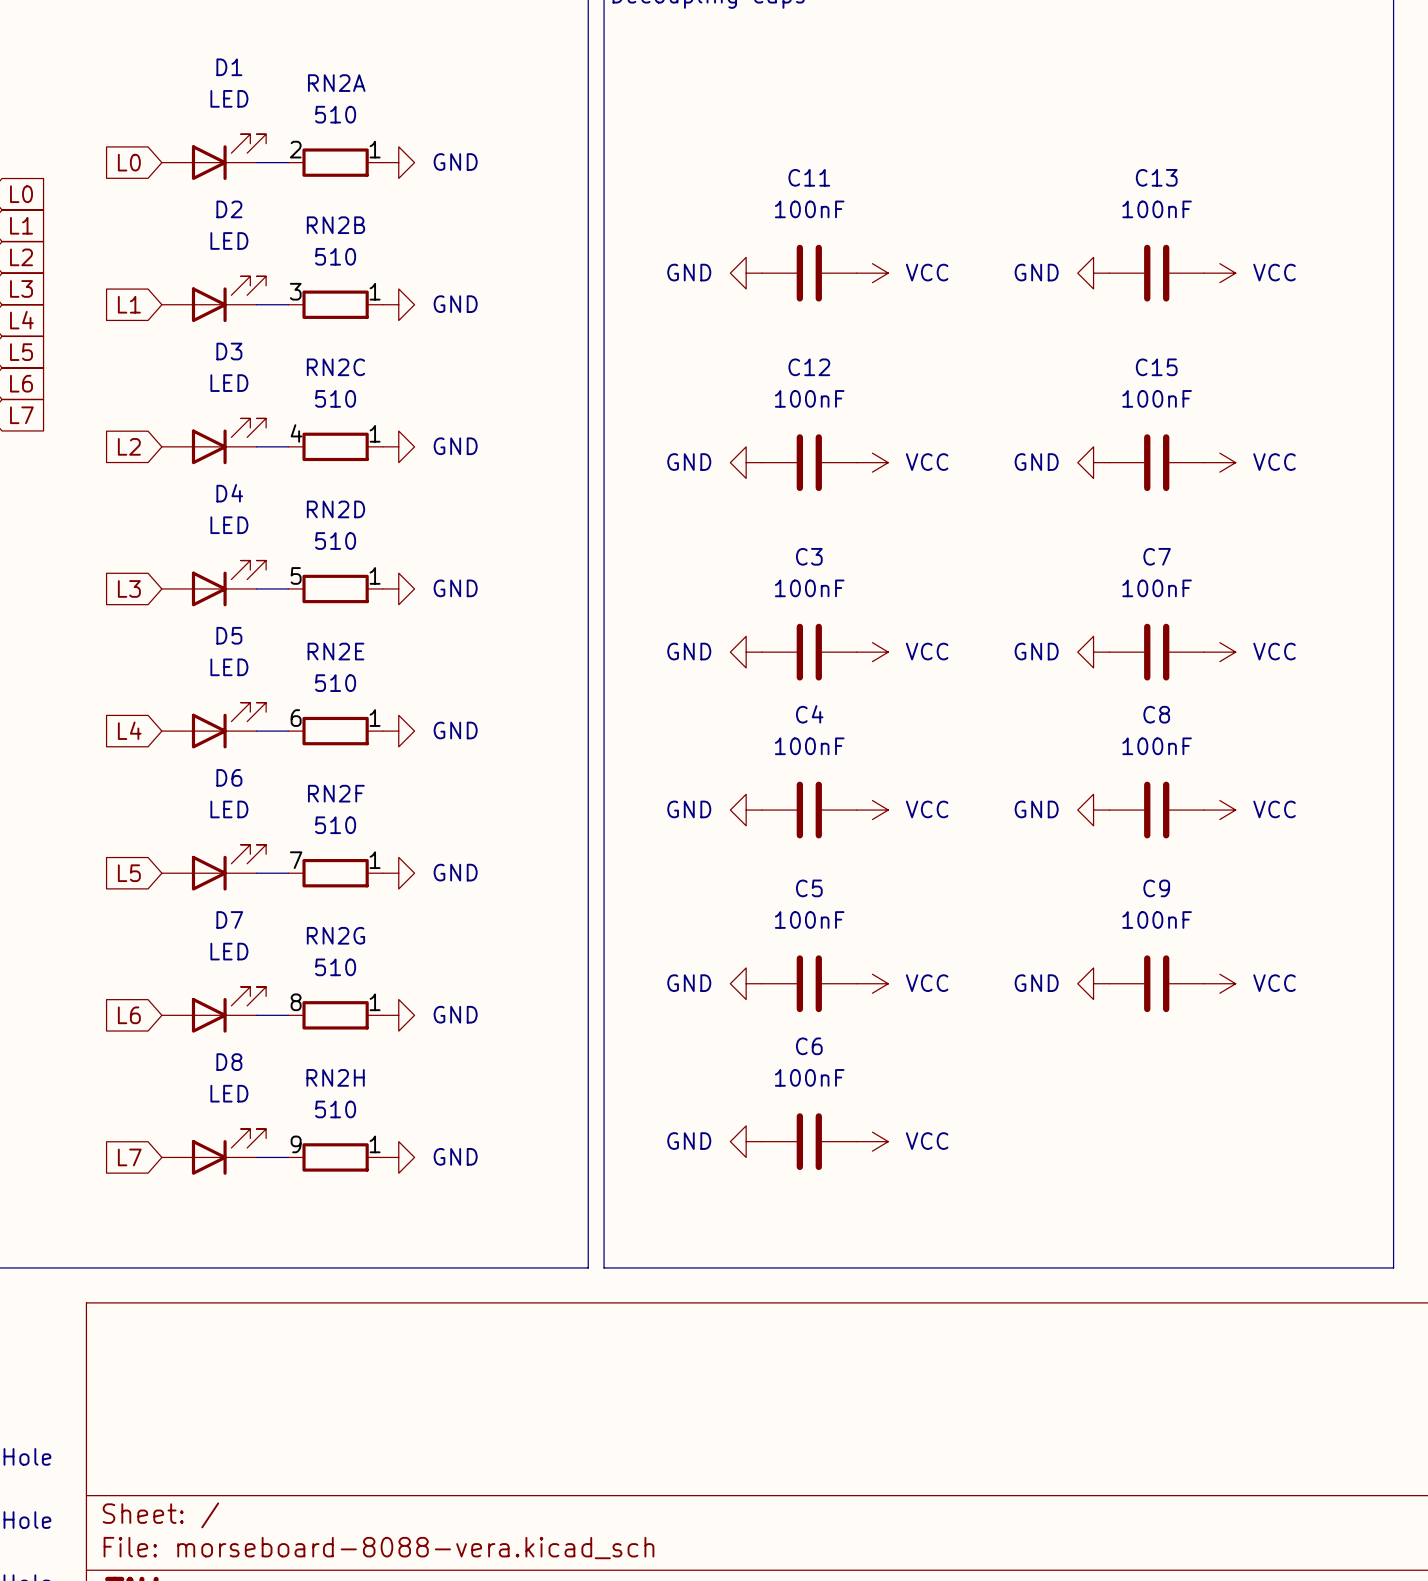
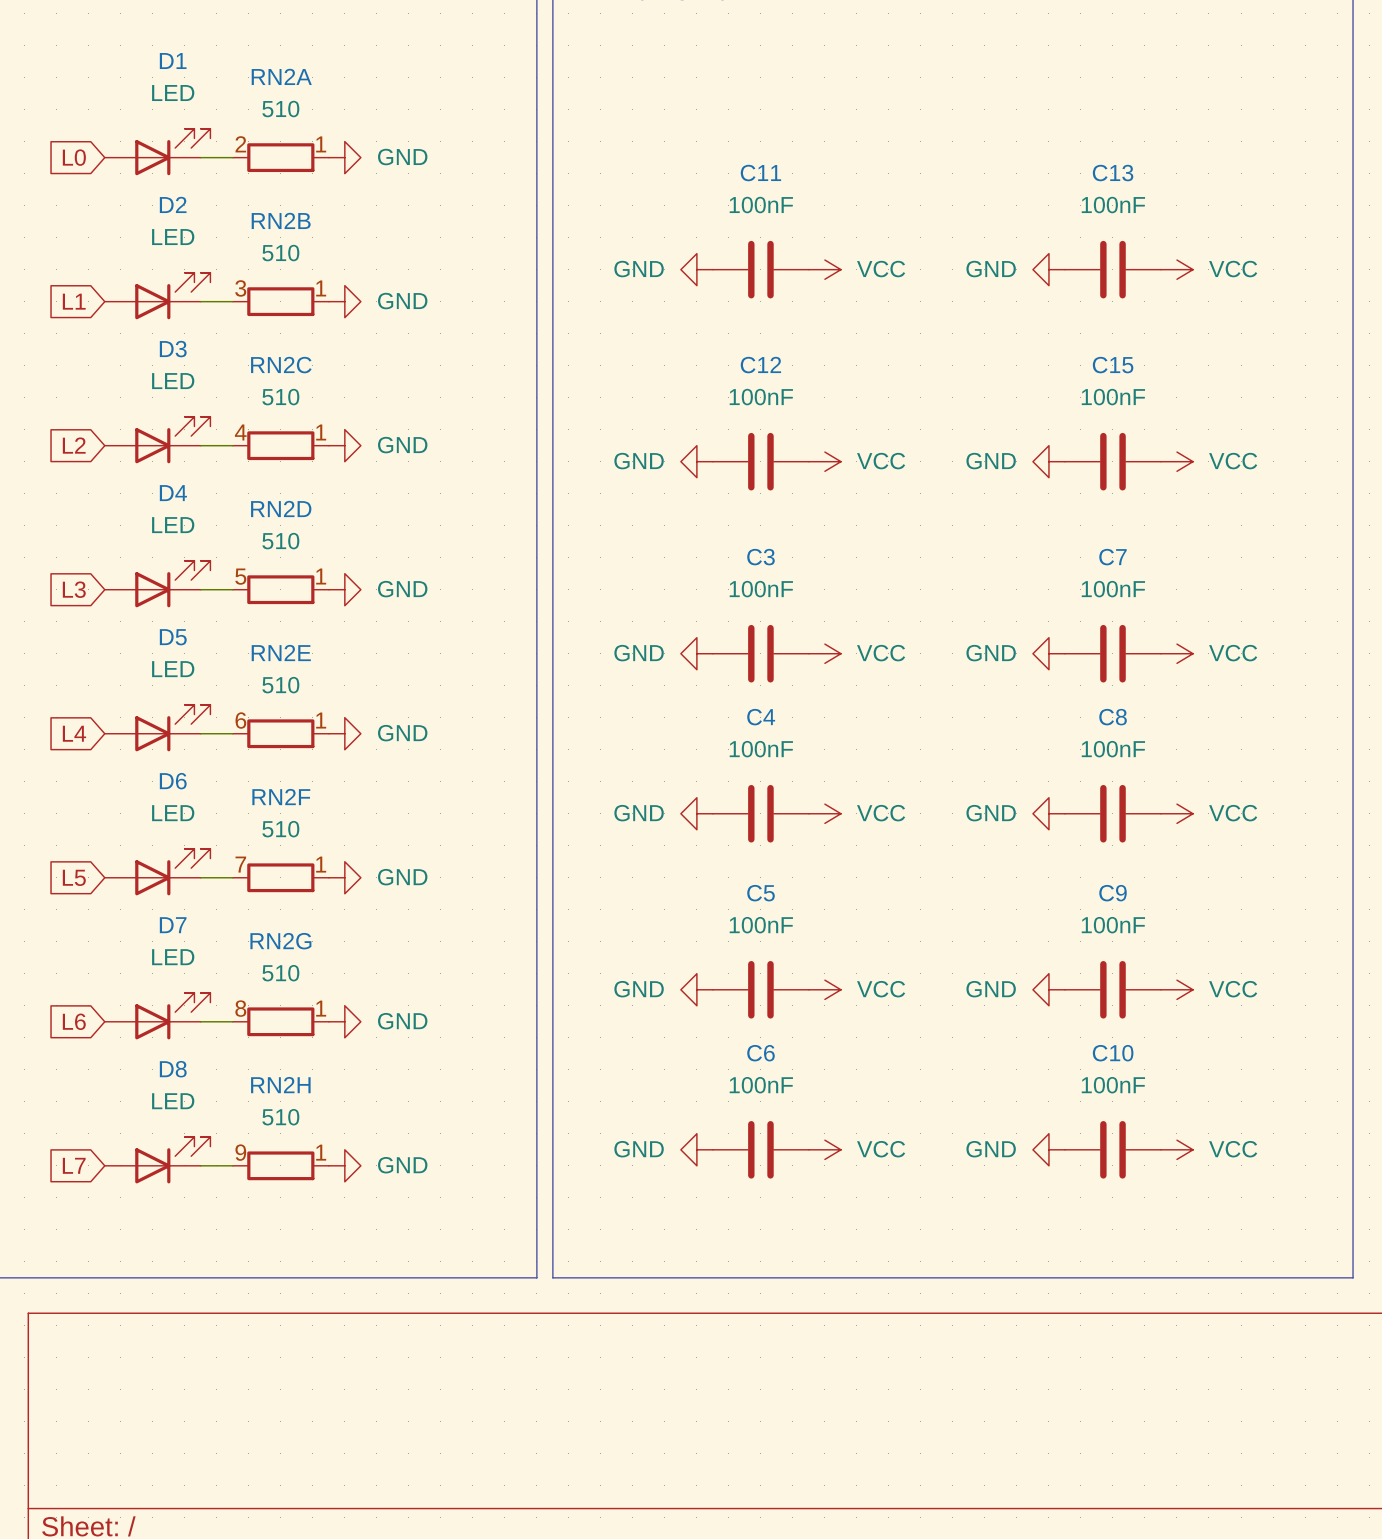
power symbol: none -> GND (1048, 1149)
C10: none -> 100nF (1112, 1149)
power symbol: none -> VCC (1176, 1149)

